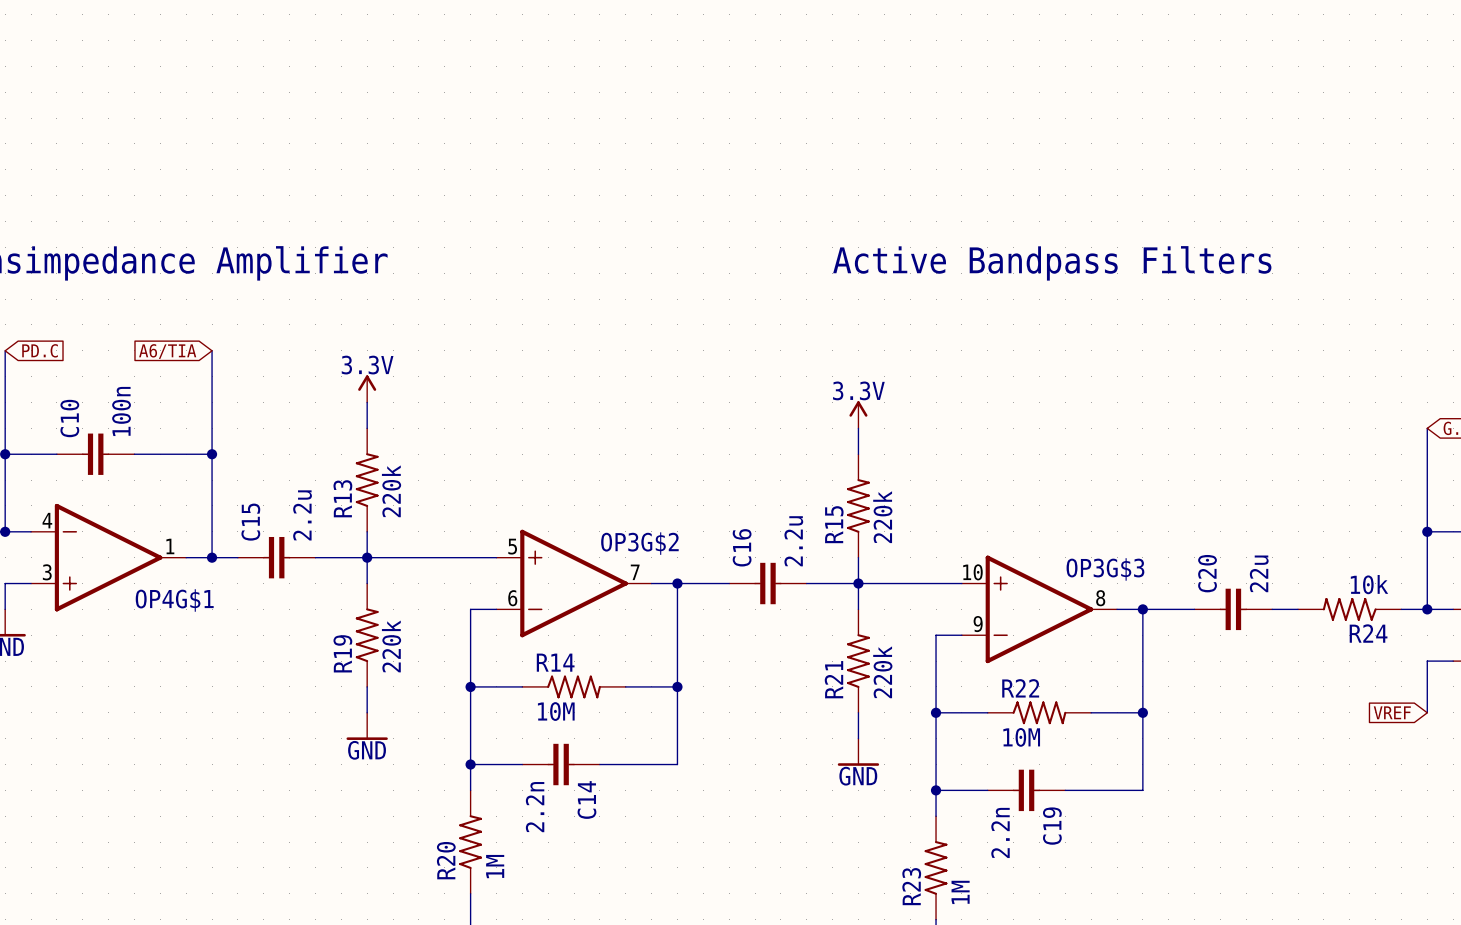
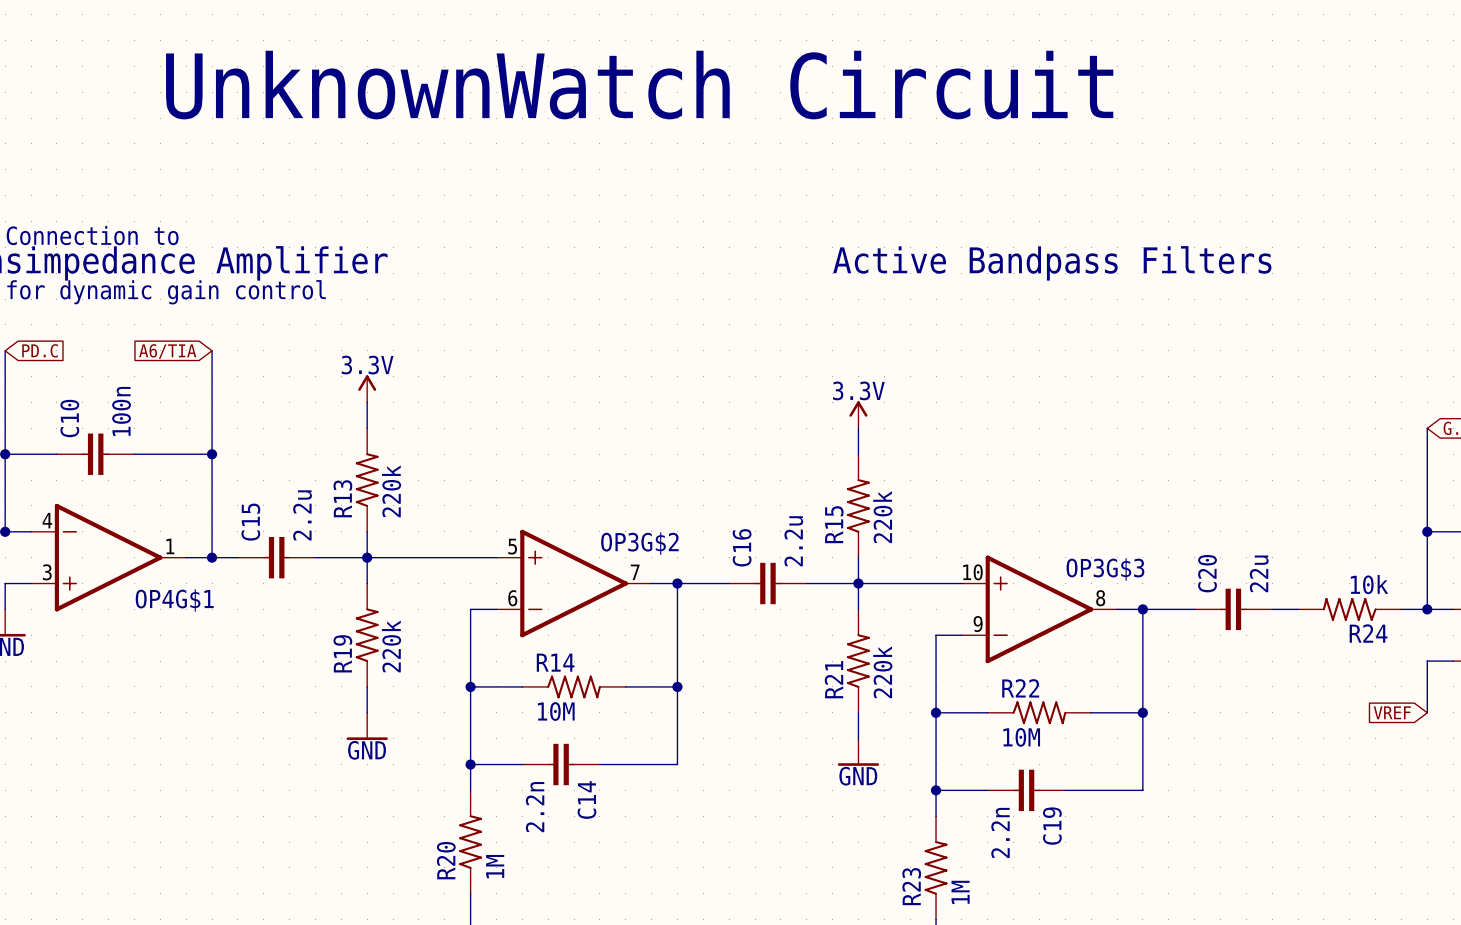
text: none -> UnknownWatch Circuit (639, 85)
text: none -> Connection to (92, 235)
text: none -> for dynamic gain control (166, 292)

